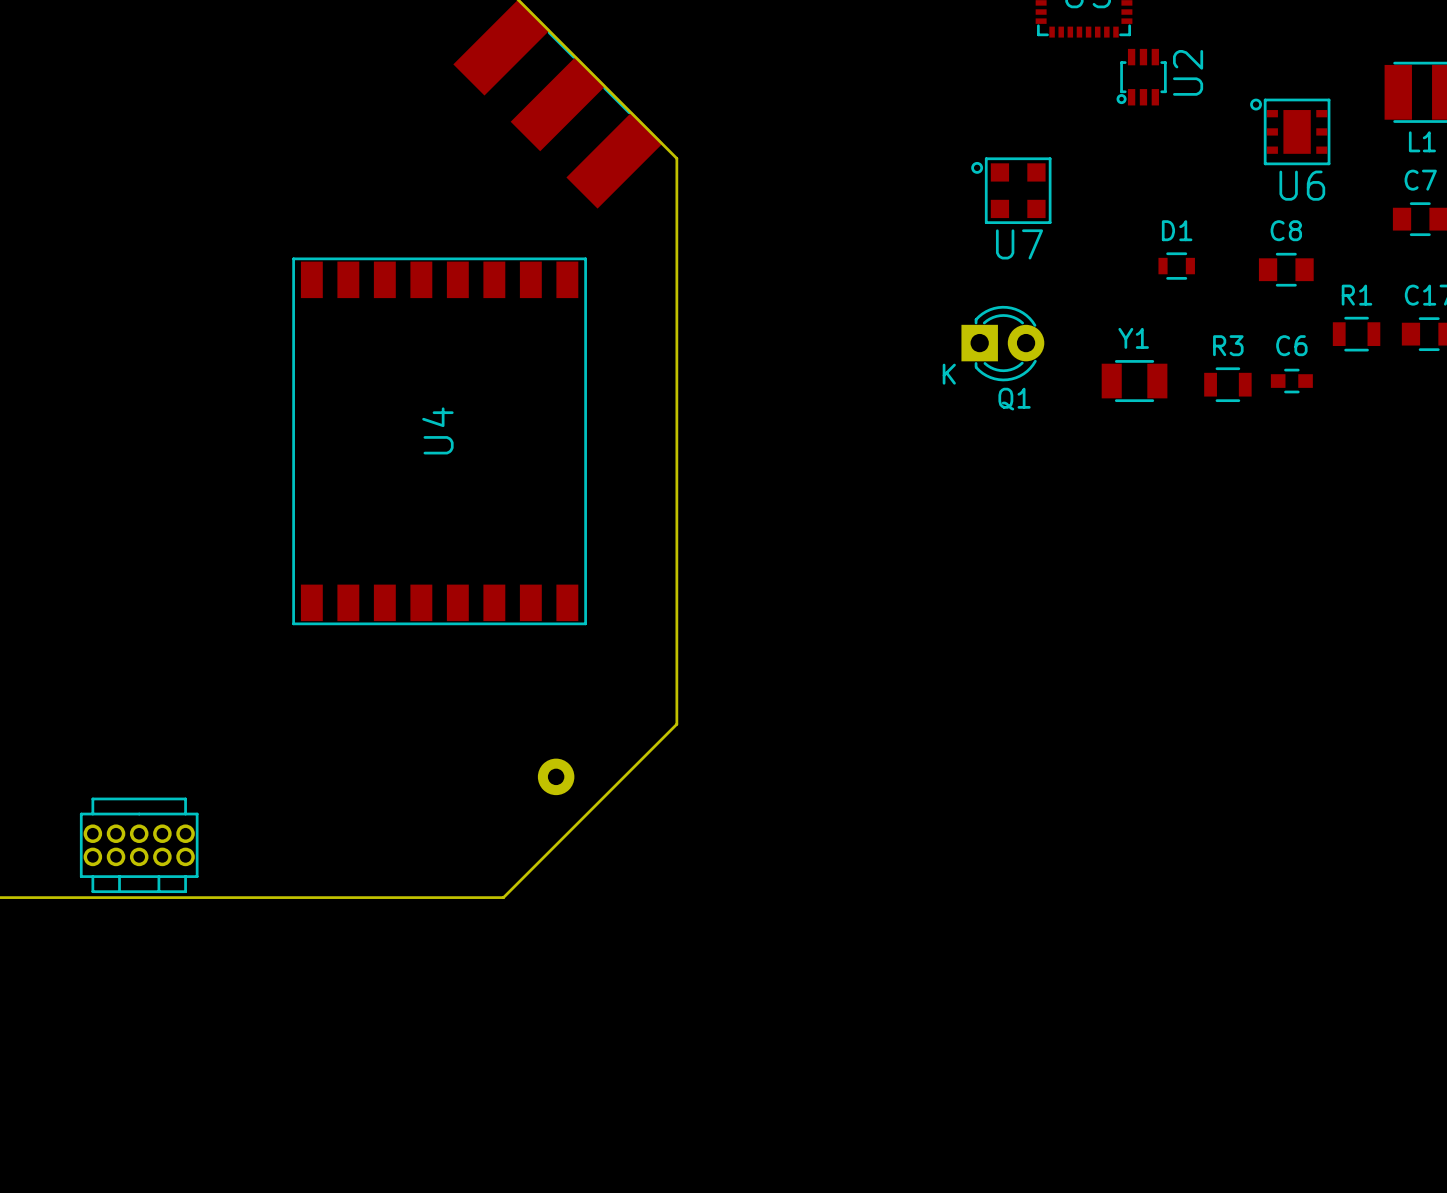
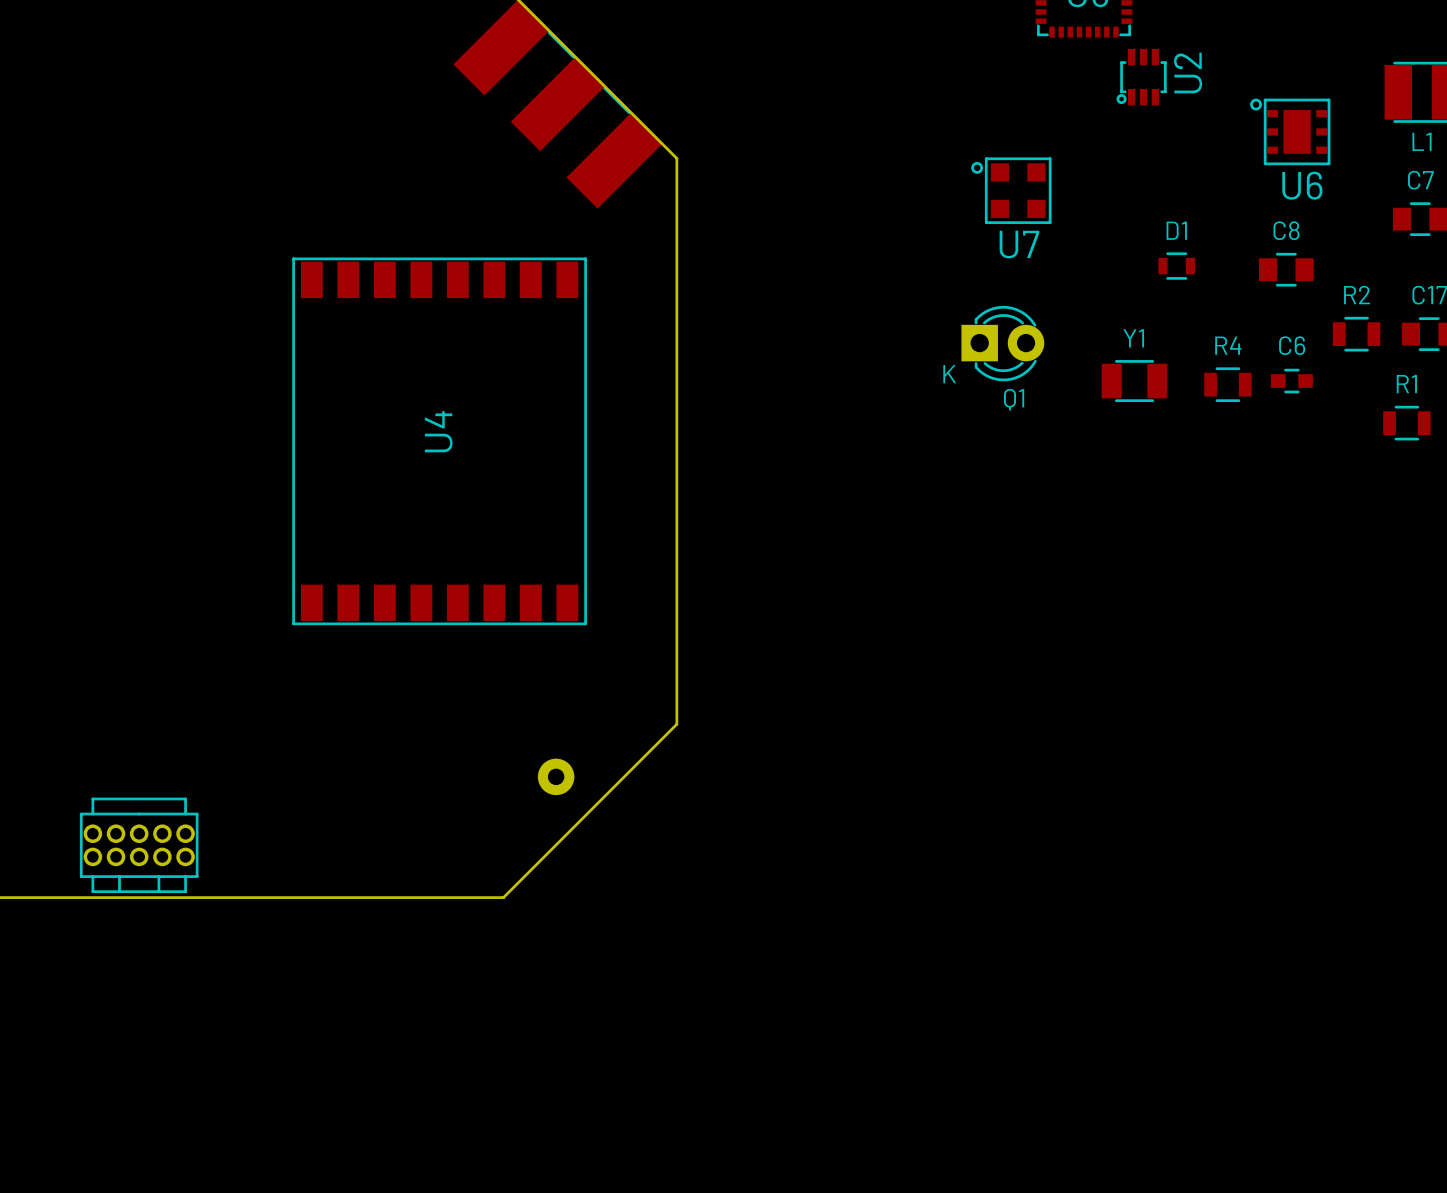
R1 name: R1 (1357, 295) -> R2 (1357, 295)
R3 name: R3 (1228, 345) -> R4 (1228, 345)
R1: none -> (1406, 423)

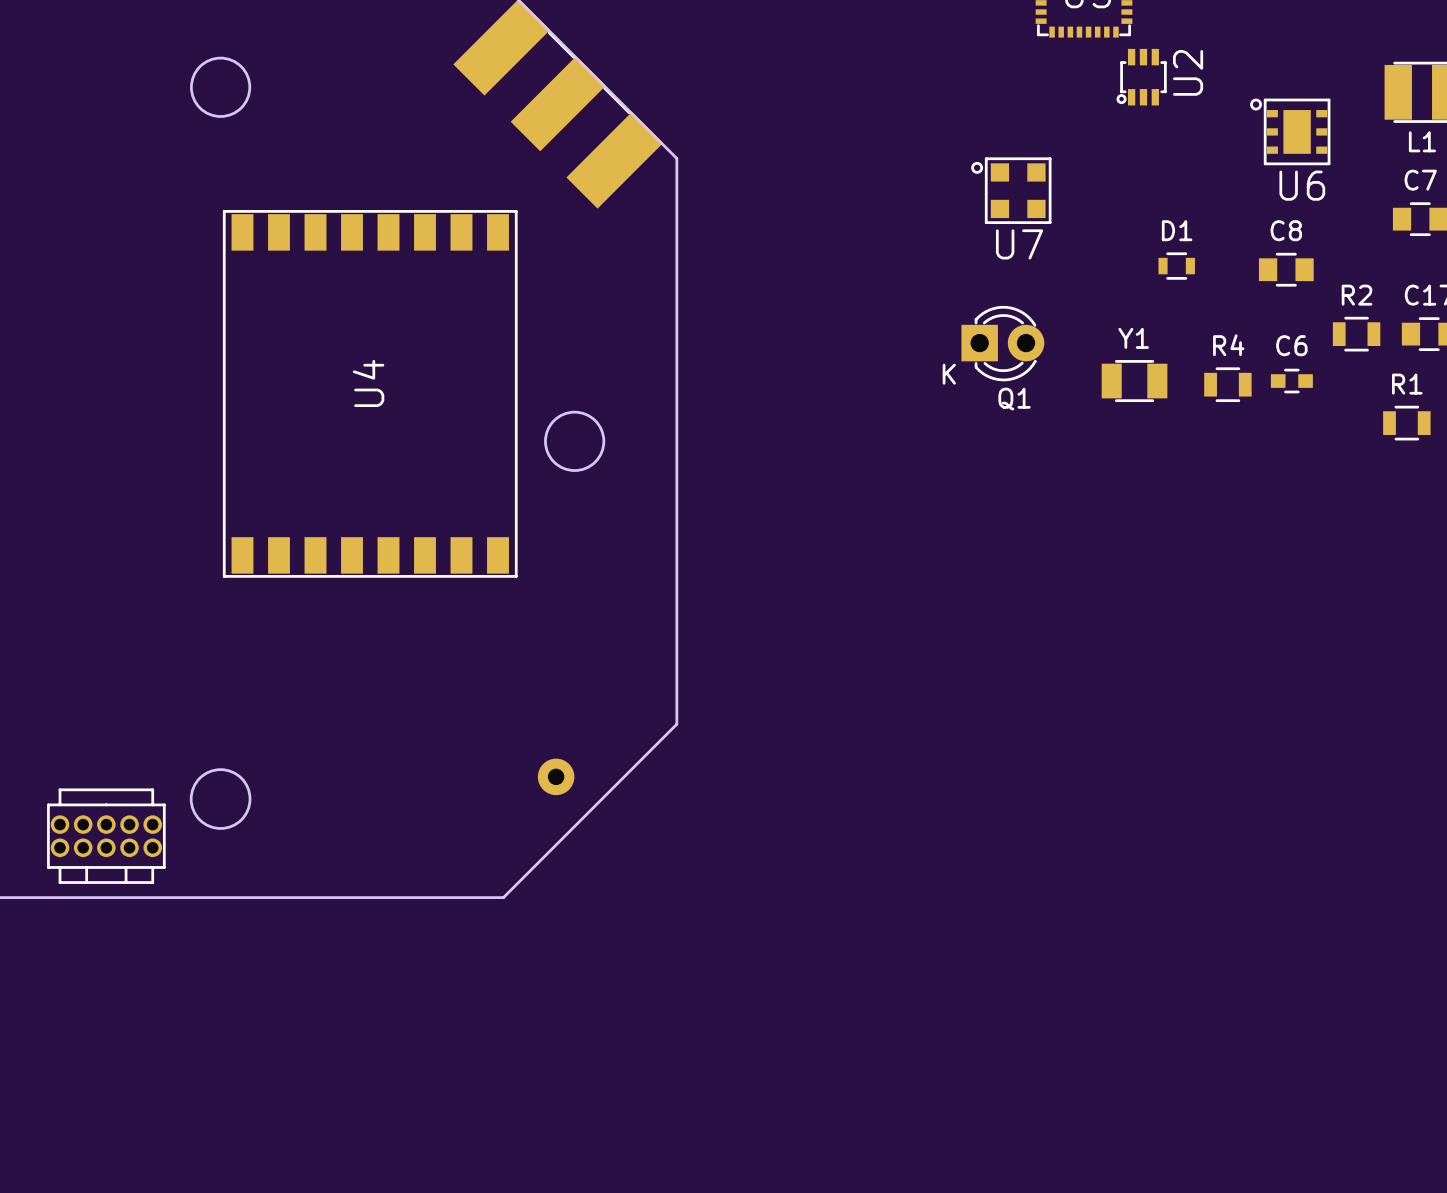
round board edge: none -> [190, 56, 252, 118]
round board edge: none -> [544, 410, 606, 472]
U4 position: (439, 441) -> (370, 393)
round board edge: none -> [189, 768, 252, 830]
part position: (139, 845) -> (106, 836)

